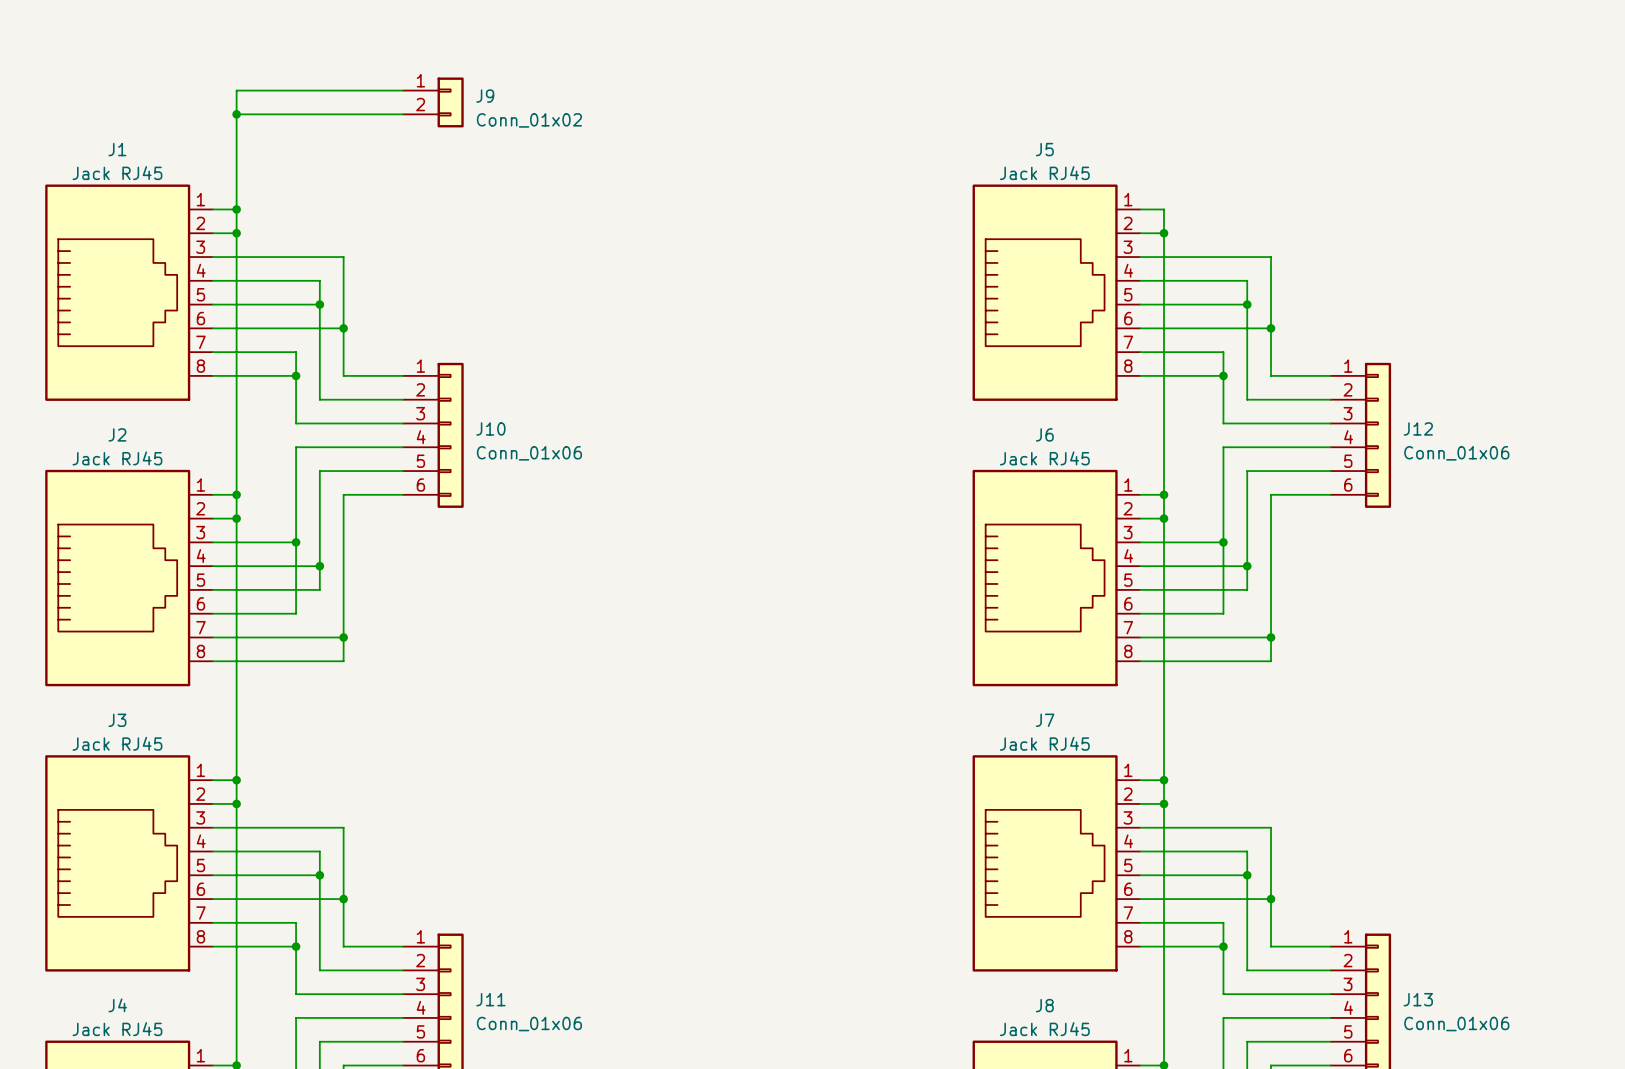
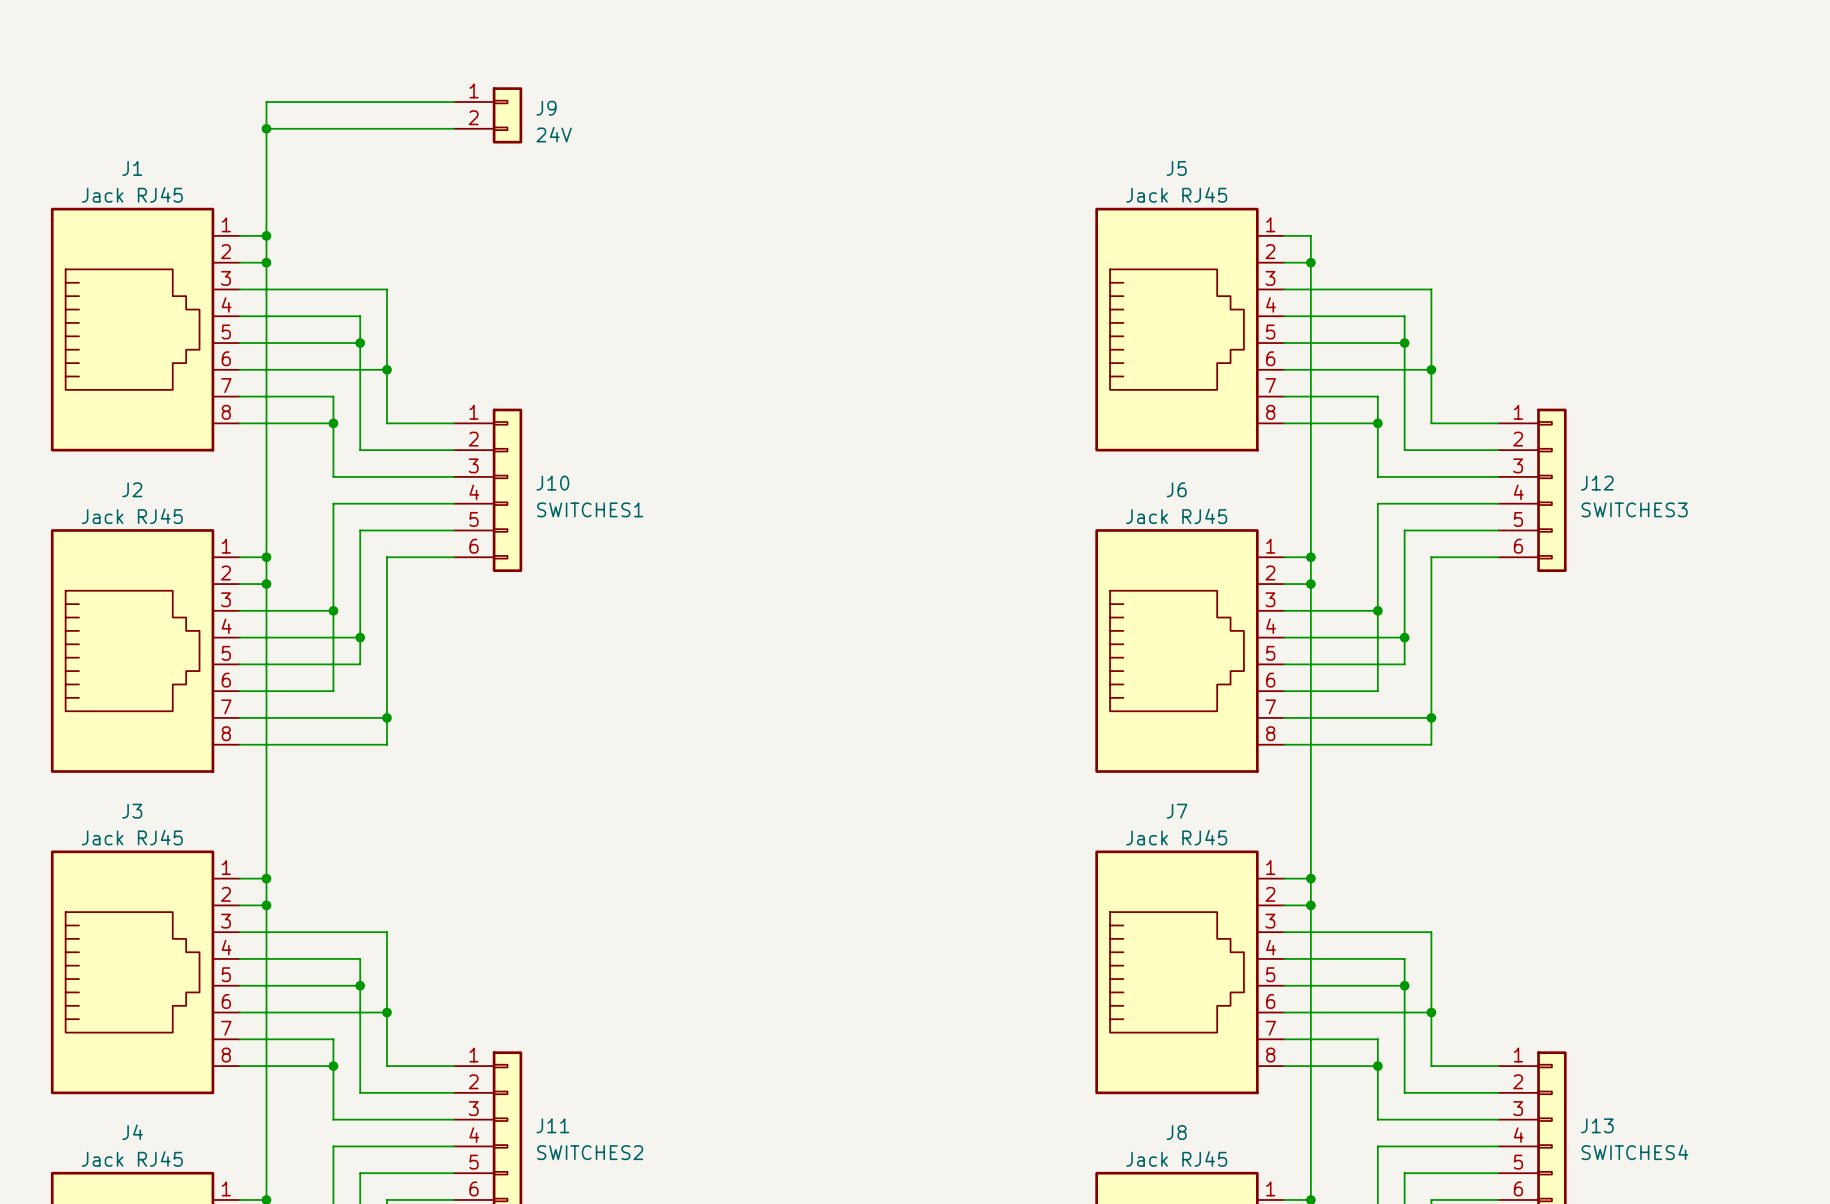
J9 value: Conn_01x02 (529, 120) -> 24V (554, 134)
J10 value: Conn_01x06 (529, 453) -> SWITCHES1 (590, 509)
J12 value: Conn_01x06 (1456, 453) -> SWITCHES3 (1634, 509)
J11 value: Conn_01x06 (529, 1024) -> SWITCHES2 (590, 1152)
J13 value: Conn_01x06 (1456, 1024) -> SWITCHES4 (1634, 1152)

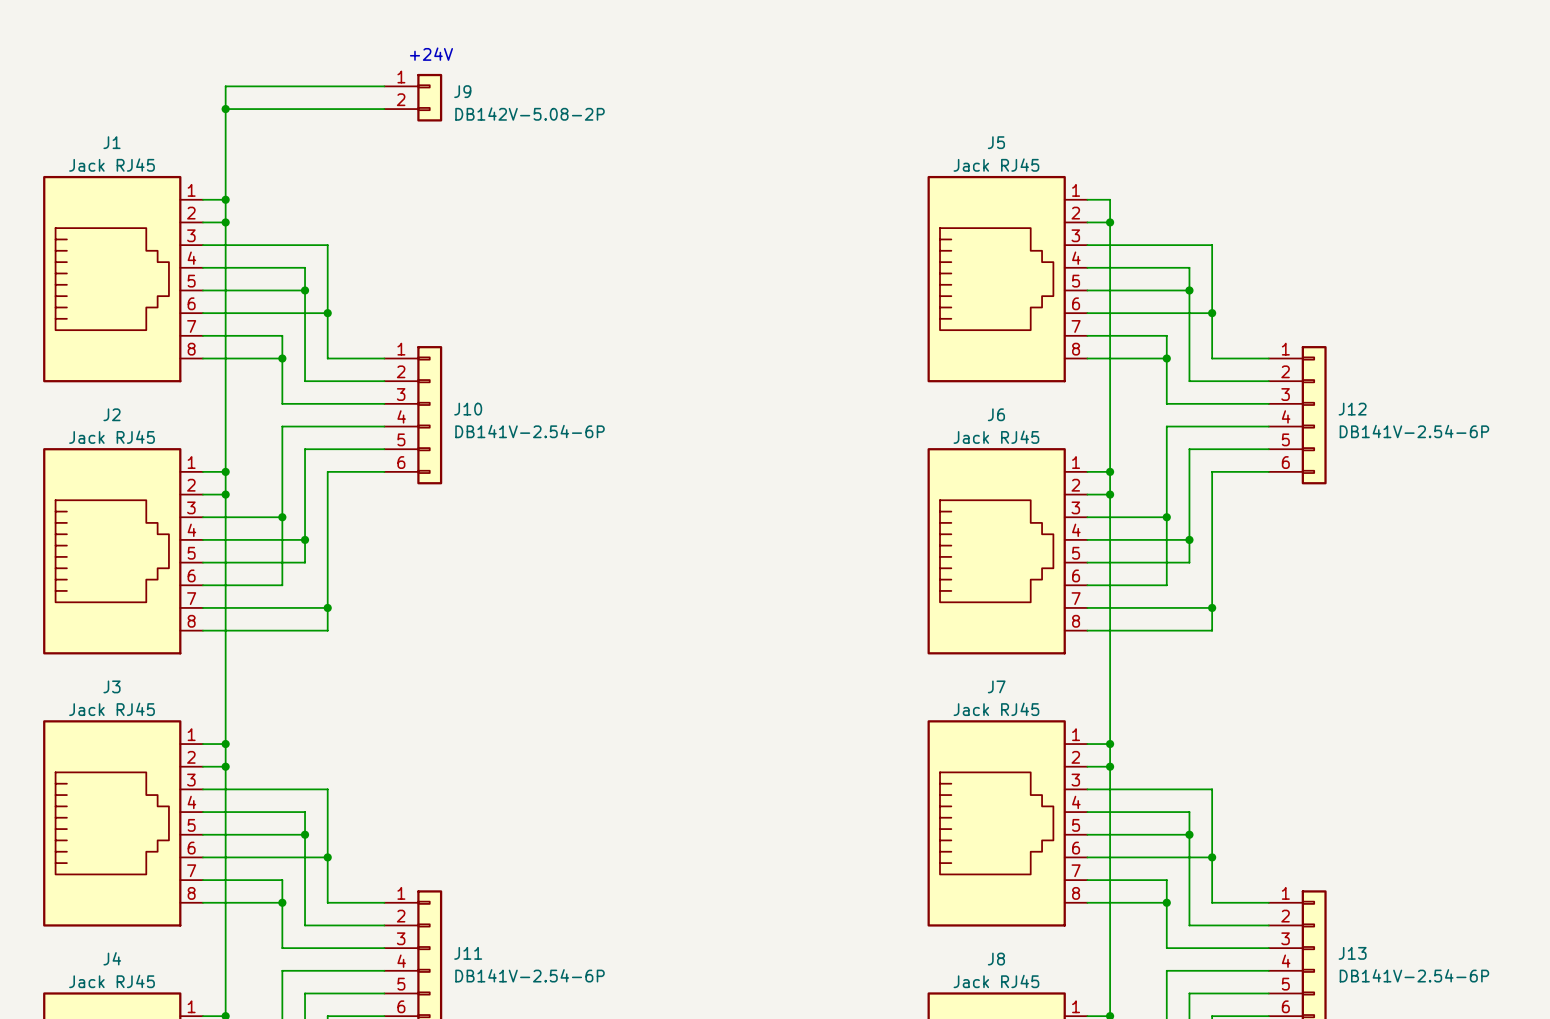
text: none -> +24V (431, 54)
J9 value: 24V (554, 134) -> DB142V-5.08-2P (530, 114)
J10 value: SWITCHES1 (590, 509) -> DB141V-2.54-6P (530, 431)
J12 value: SWITCHES3 (1634, 509) -> DB141V-2.54-6P (1414, 431)
J11 value: SWITCHES2 (590, 1152) -> DB141V-2.54-6P (530, 975)
J13 value: SWITCHES4 (1634, 1152) -> DB141V-2.54-6P (1414, 975)

